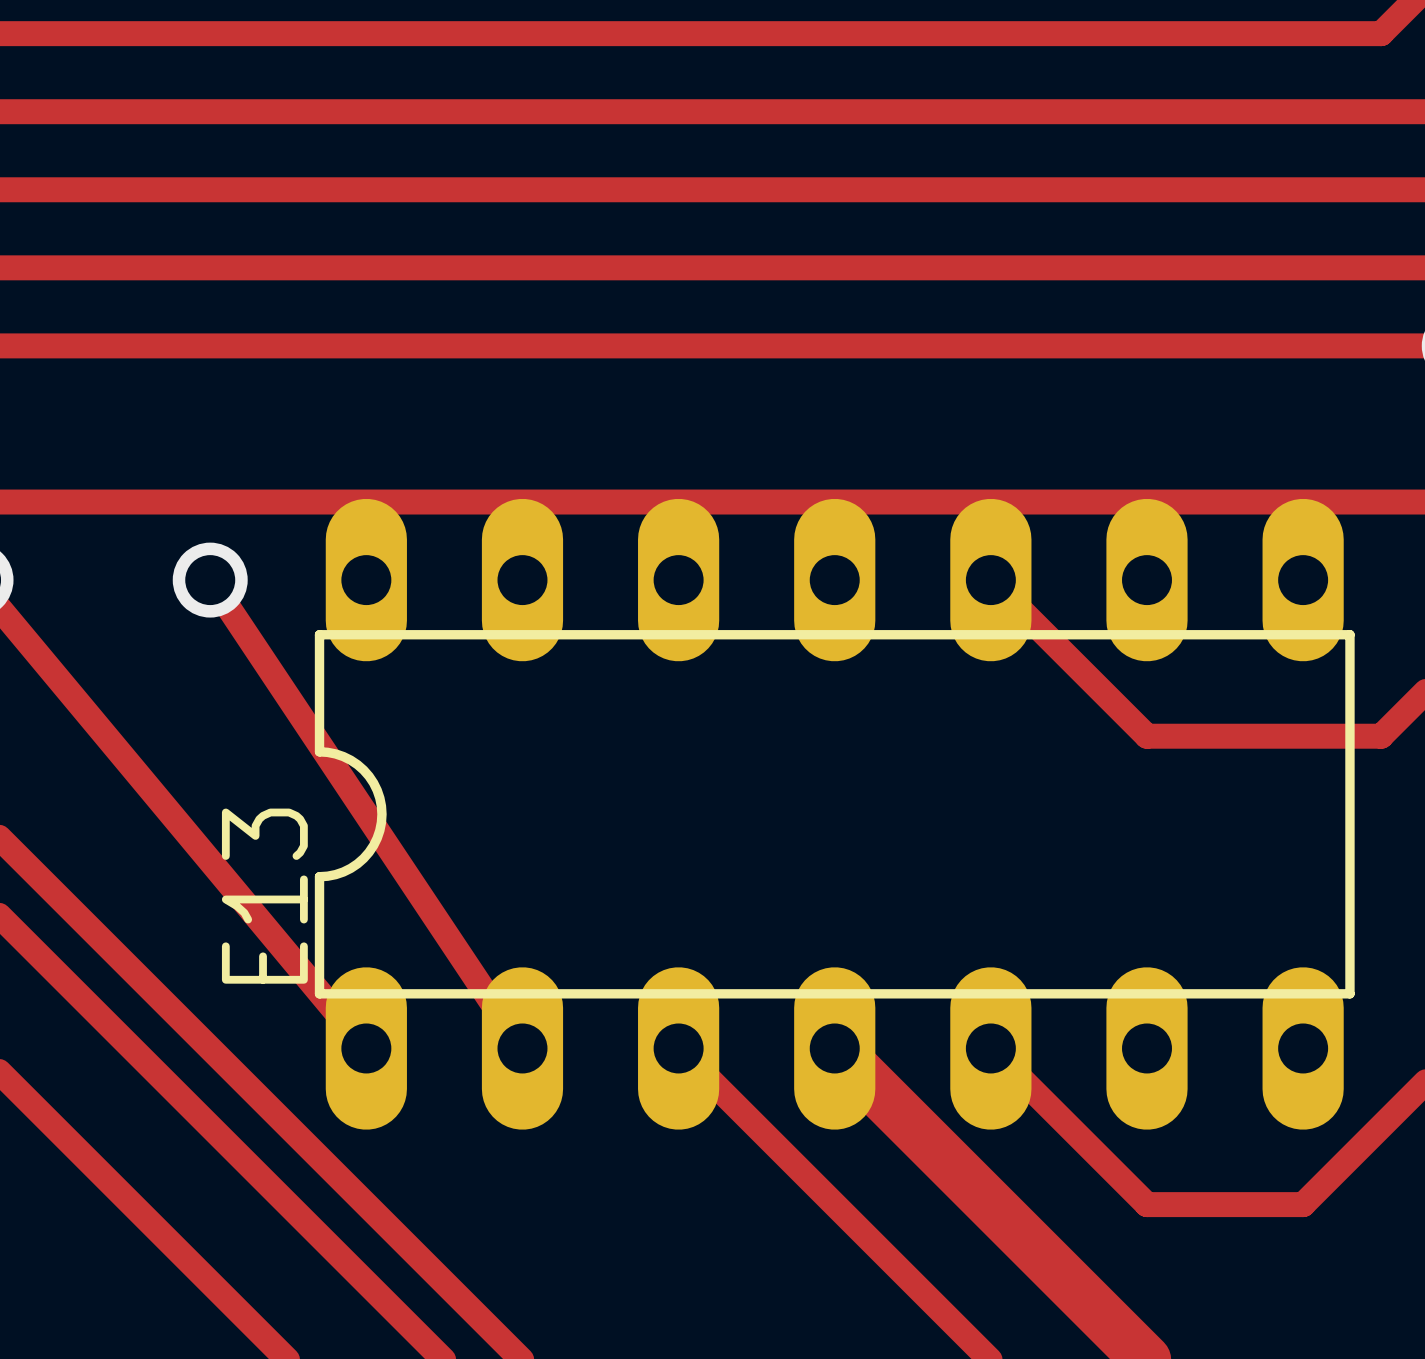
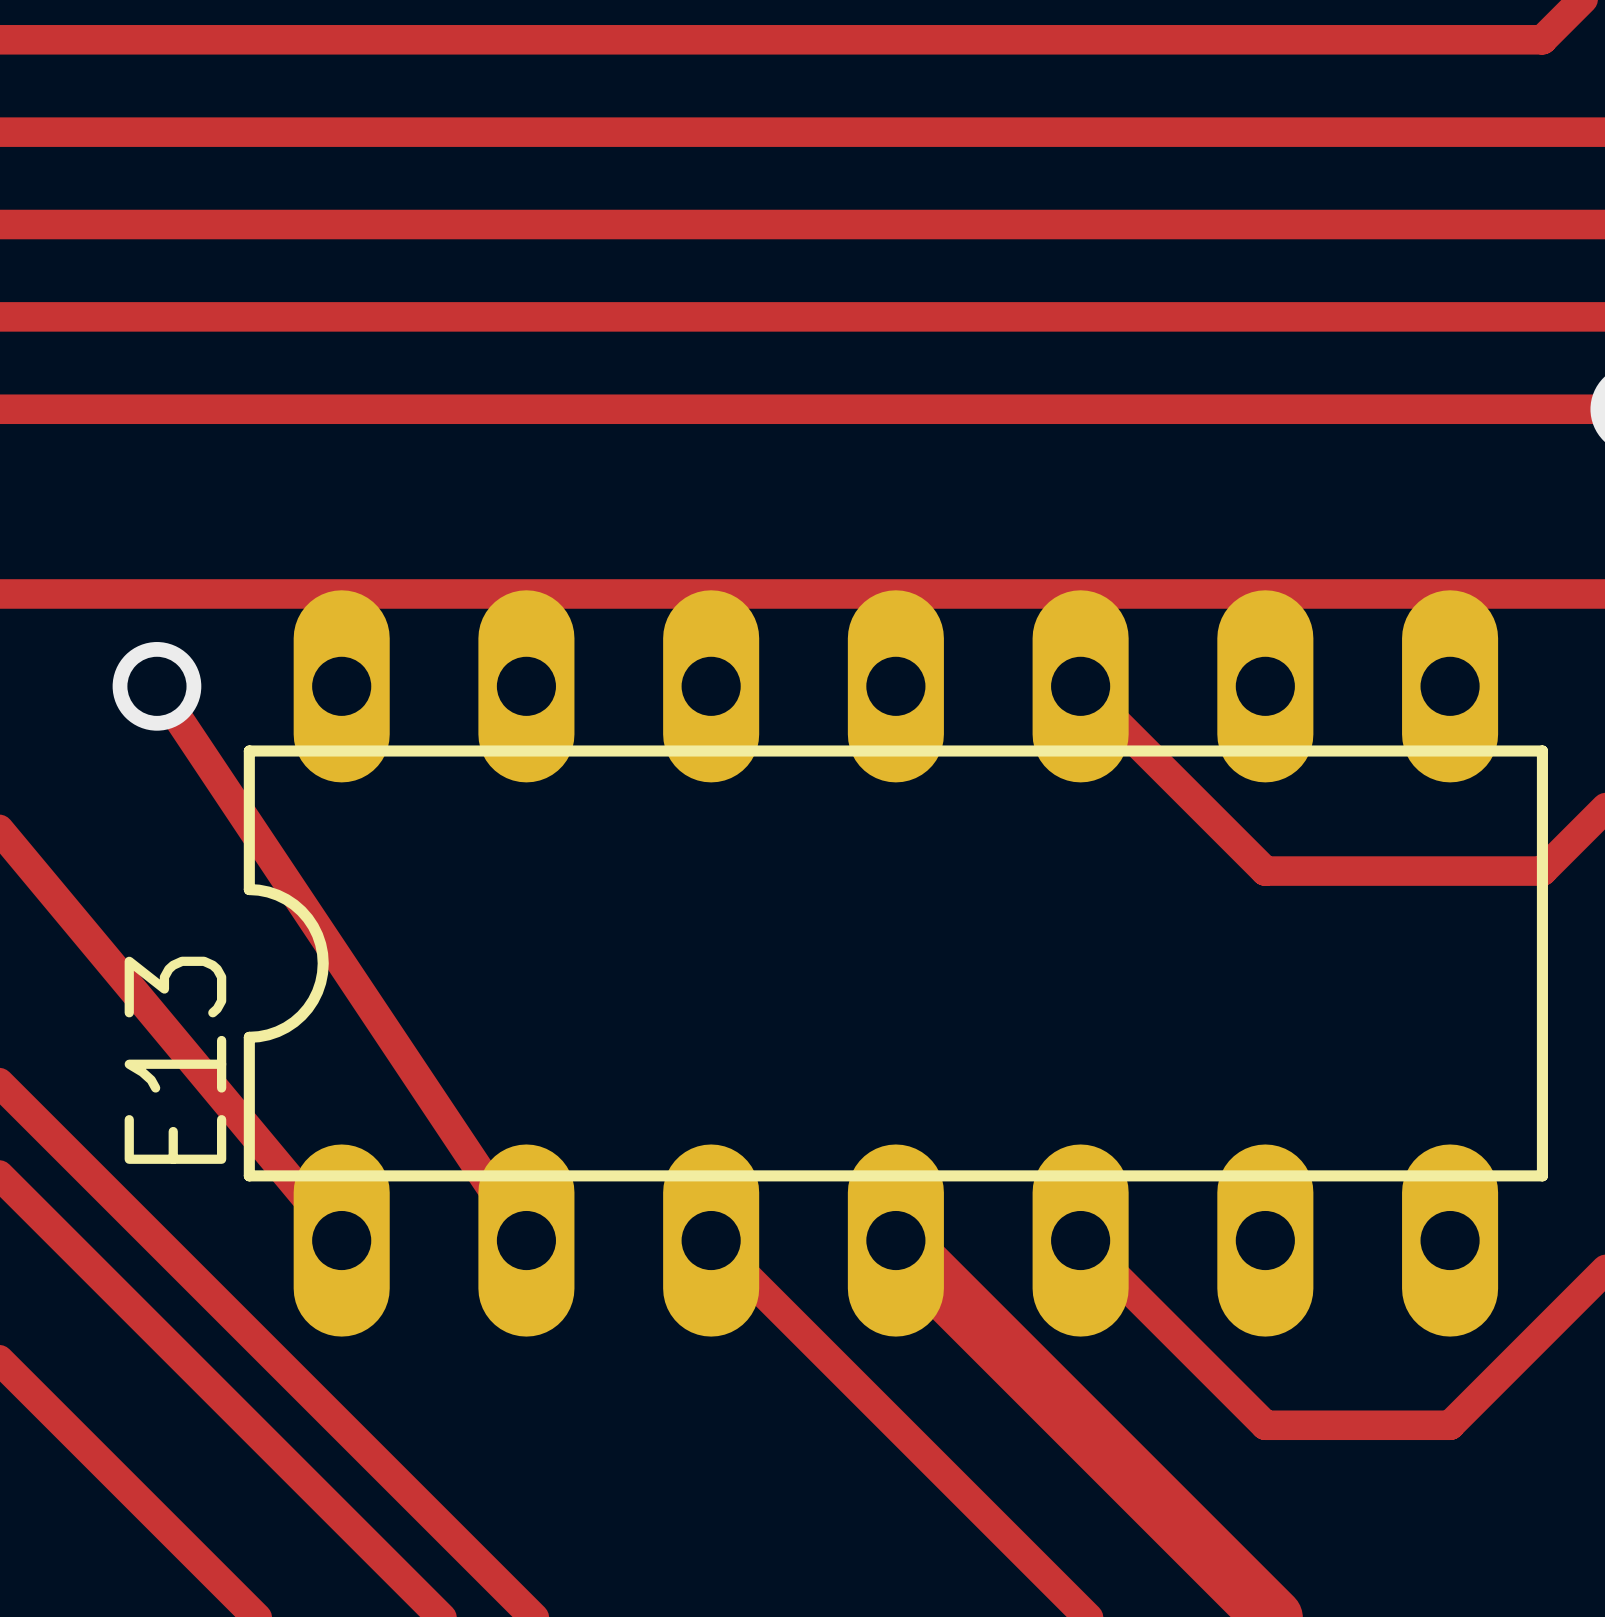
E13 footprint: [314, 498, 1355, 1130] -> [243, 590, 1548, 1337]
E13 name position: E13 (264, 896) -> E13 (175, 1060)

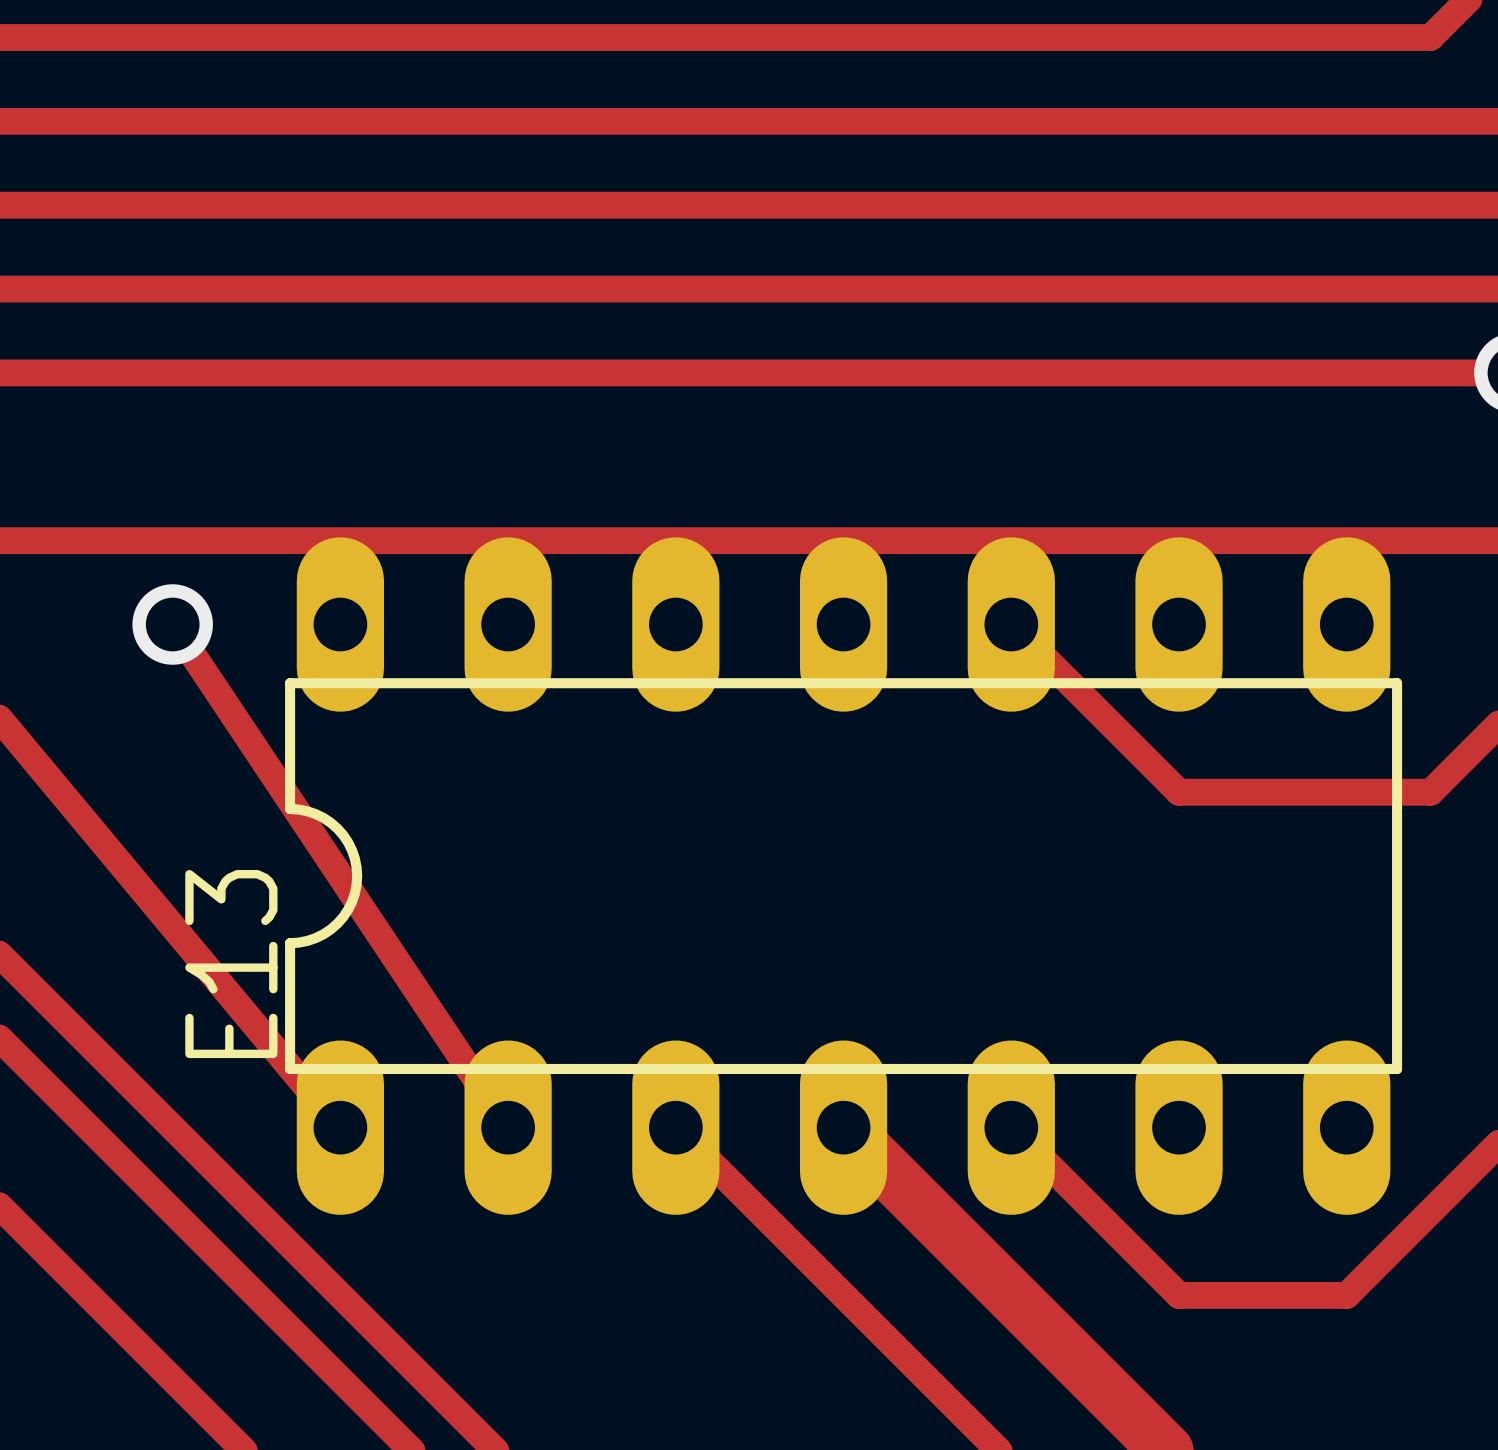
E13 footprint: [243, 590, 1548, 1337] -> [285, 537, 1403, 1215]
E13 name position: E13 (175, 1060) -> E13 (231, 964)

